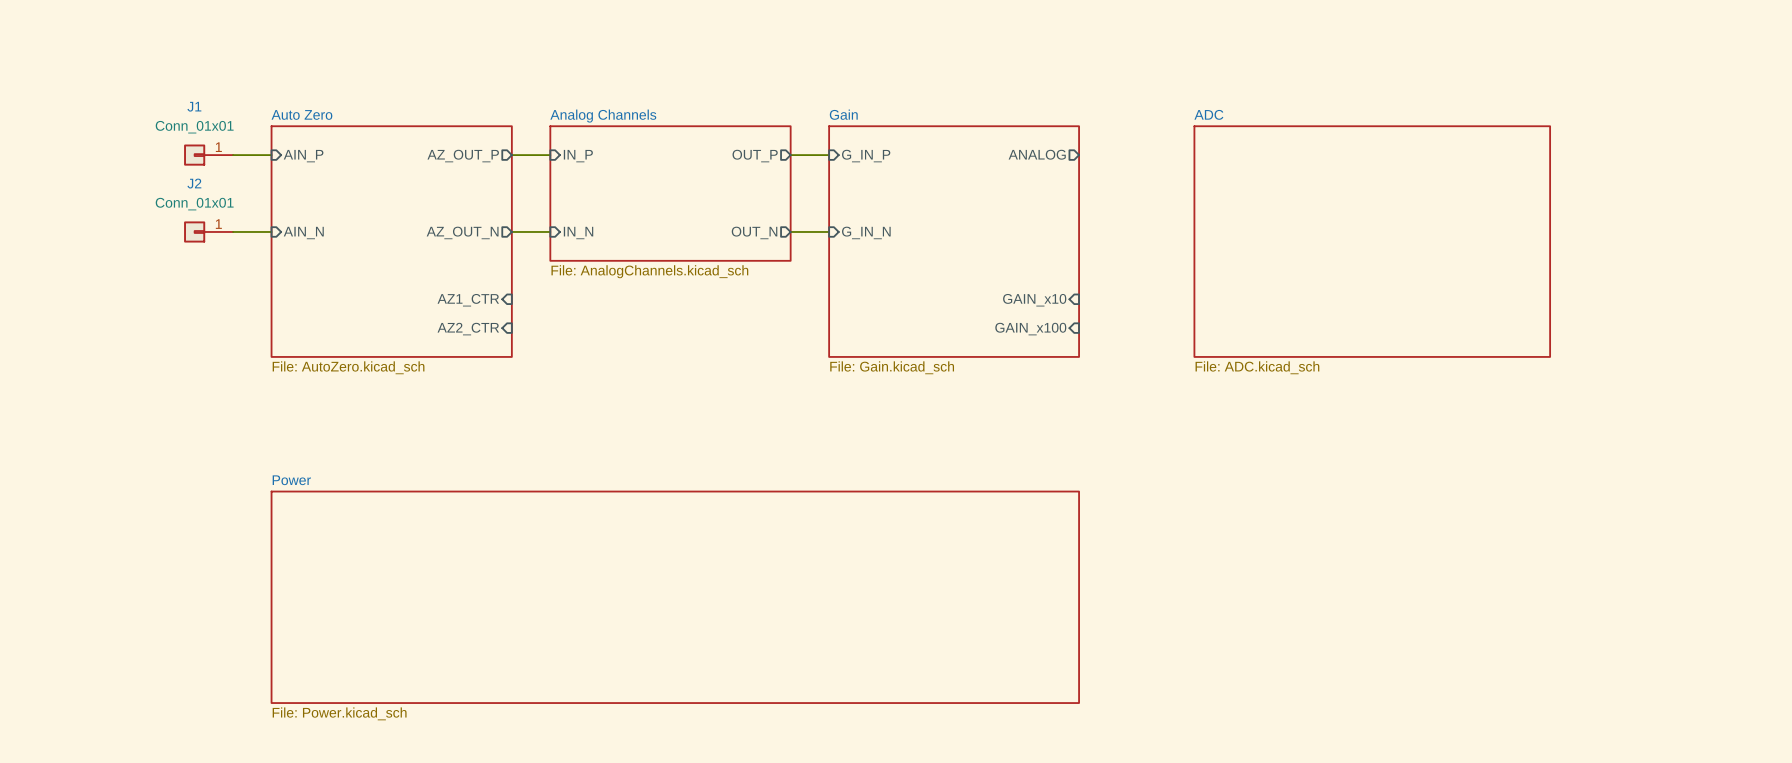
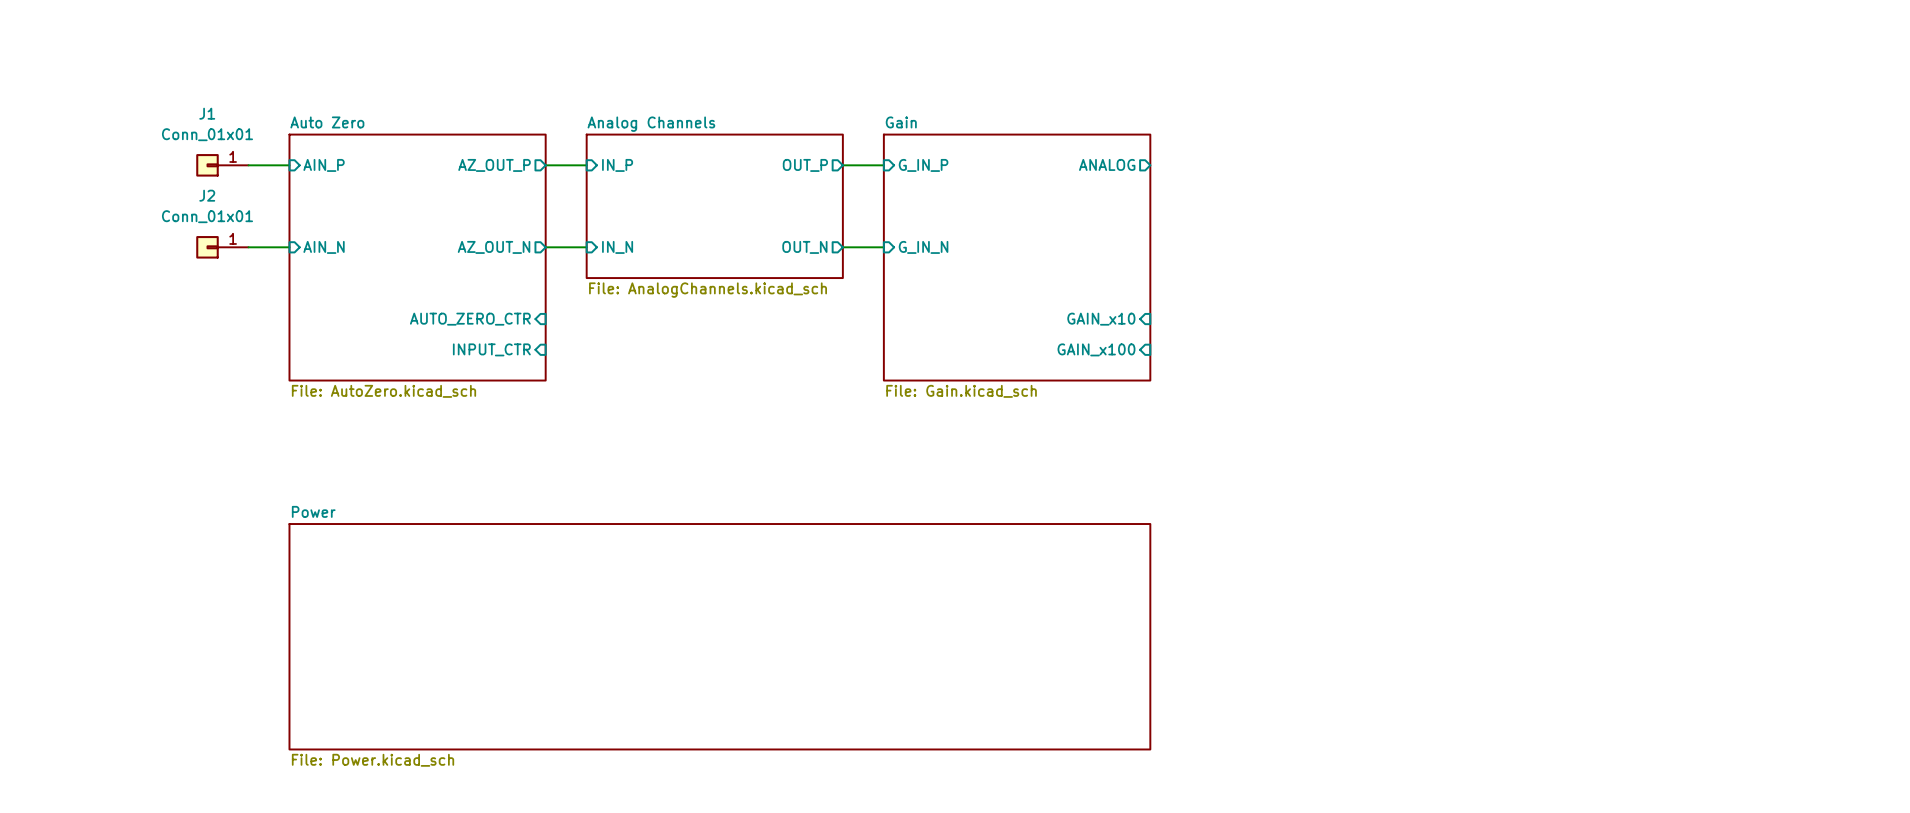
sheet ADC: File: ADC.kicad_sch (1372, 241) -> none
sheet pin: AZ1_CTR (468, 300) -> AUTO_ZERO_CTR (470, 319)
sheet pin: AZ2_CTR (468, 329) -> INPUT_CTR (491, 349)

